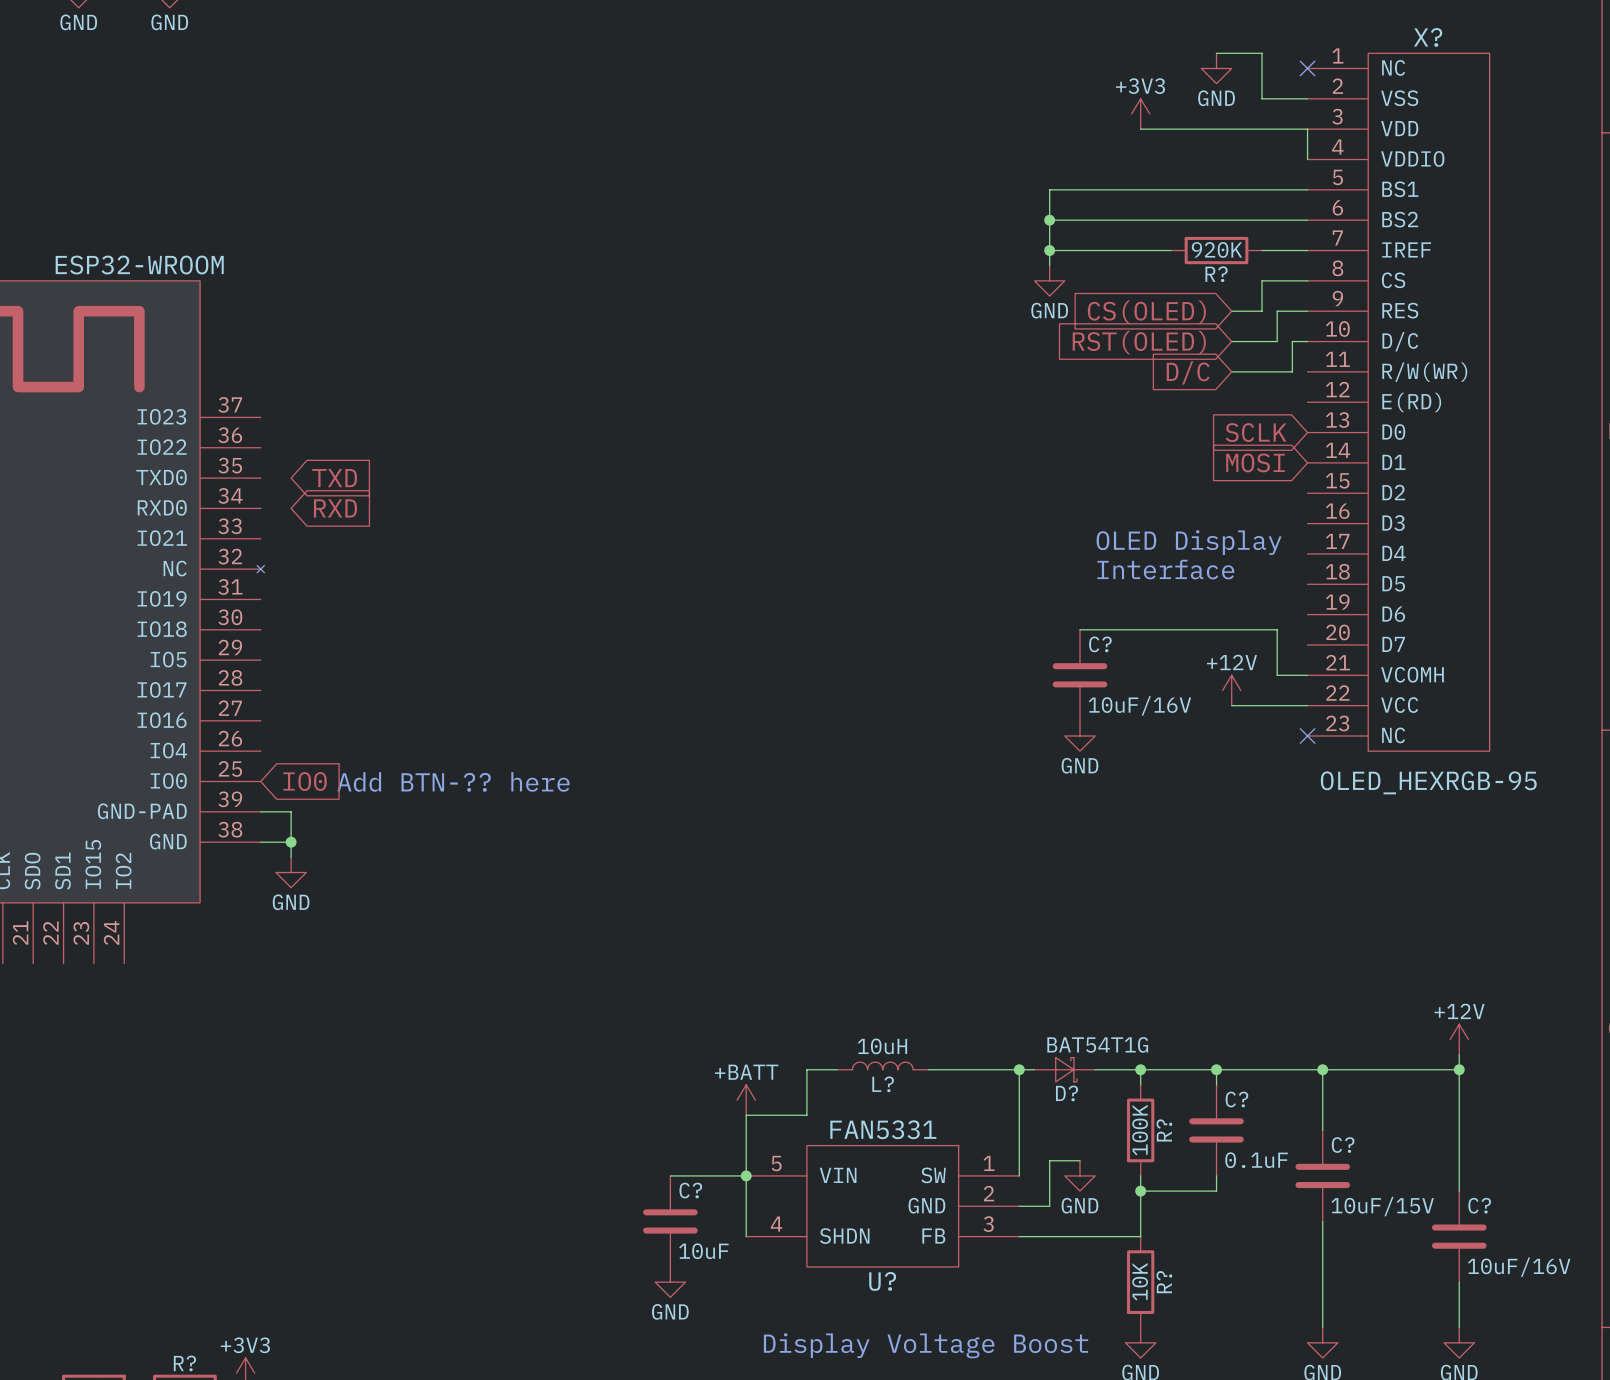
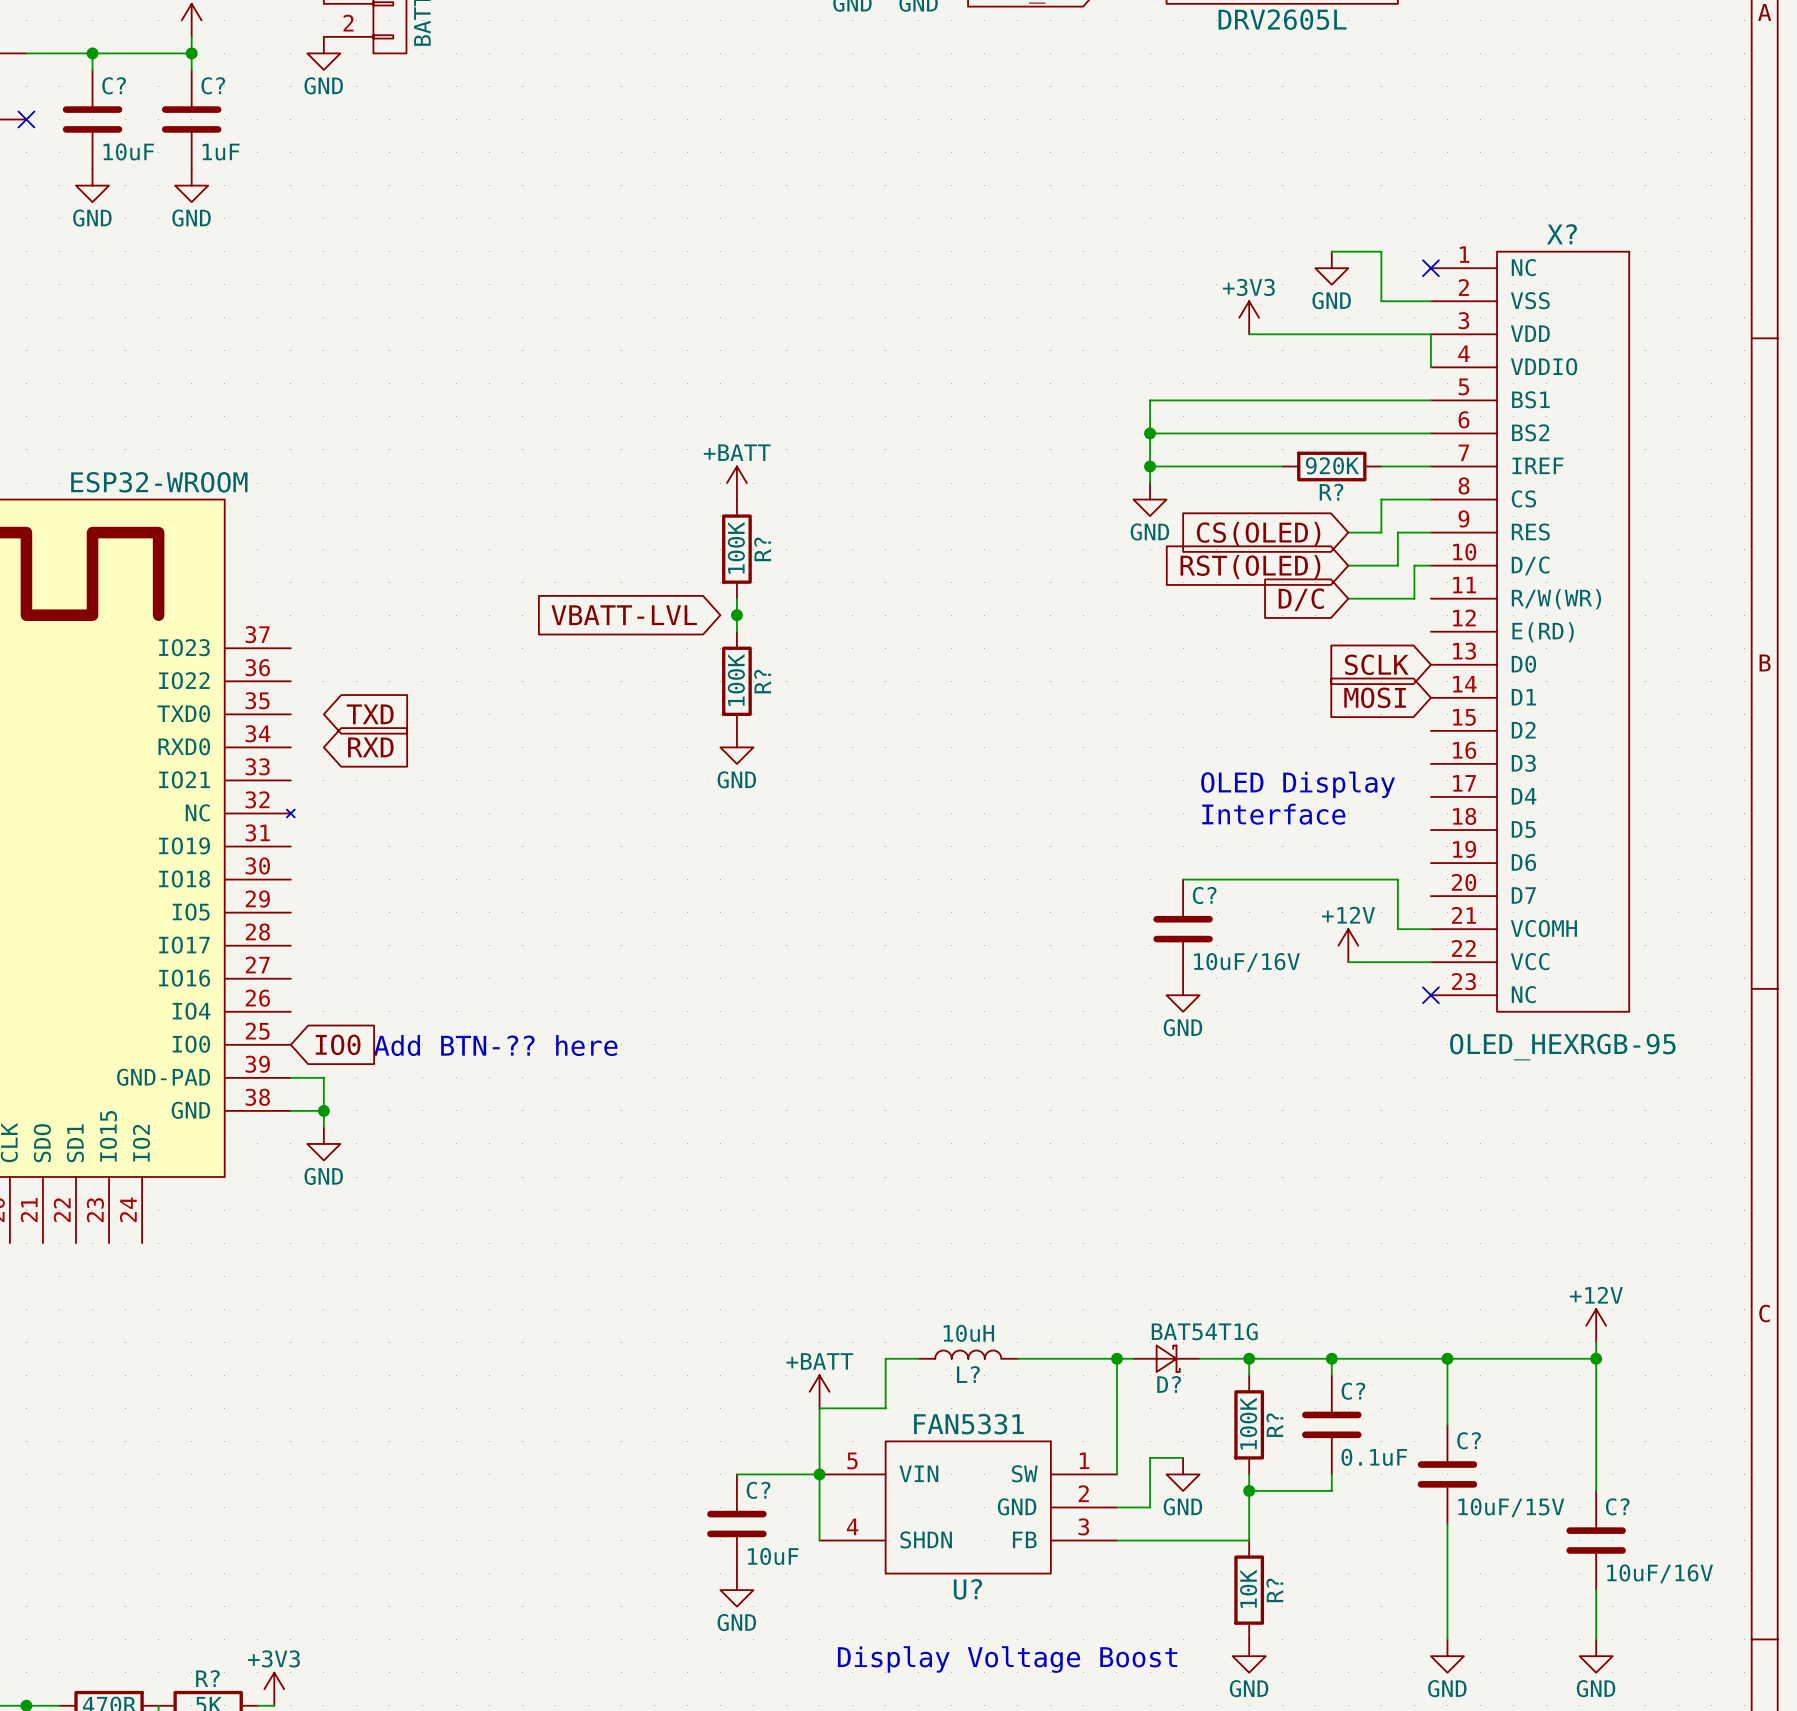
power symbol: none -> +BATT (736, 483)
R?: none -> 100K (736, 549)
wire: none -> (736, 598) (736, 631)
global label: none -> VBATT-LVL (624, 615)
junction: none -> (736, 615)
R?: none -> 100K (736, 681)
power symbol: none -> GND (736, 747)

